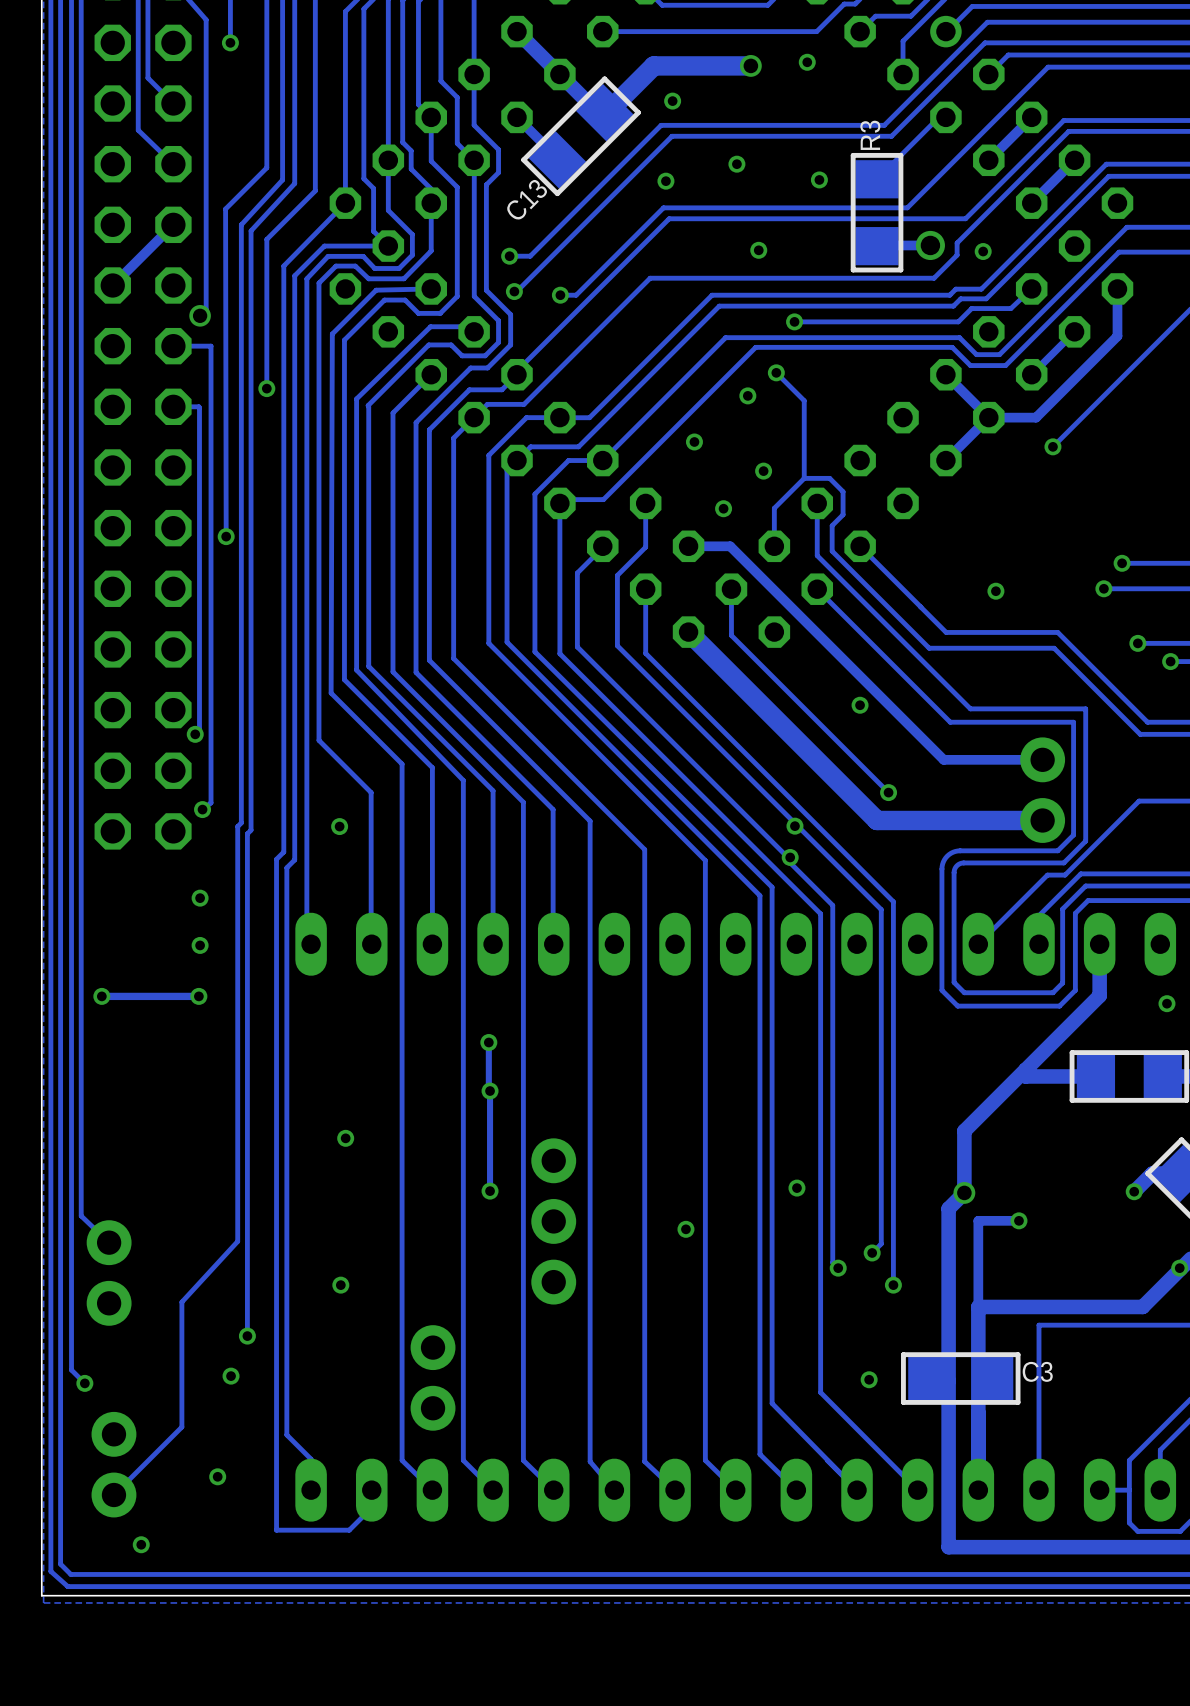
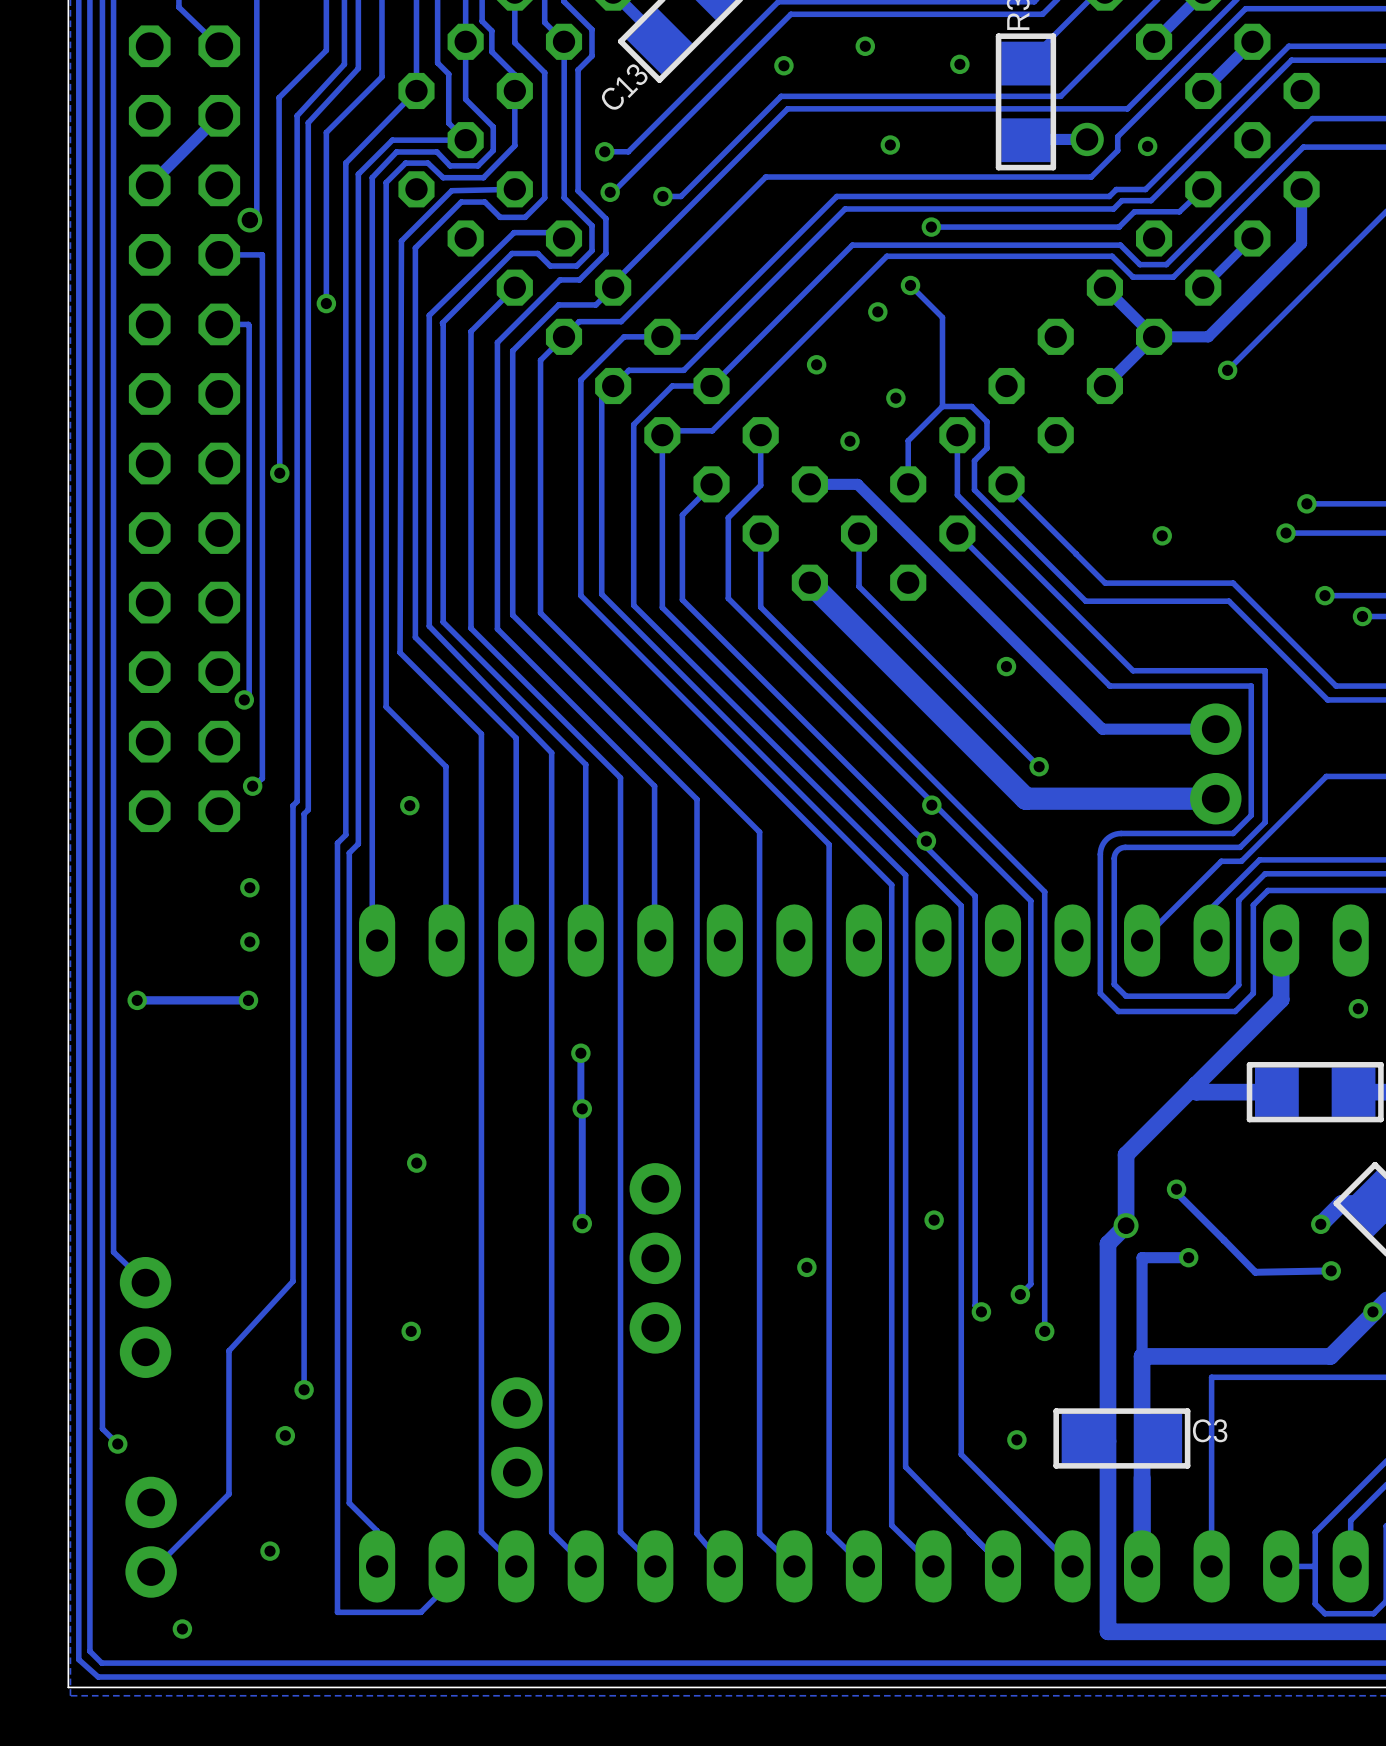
track: none -> (1176, 1189) (1176, 1192) (1255, 1272) (1331, 1270)
via: none -> (1176, 1189)
via: none -> (1331, 1270)

